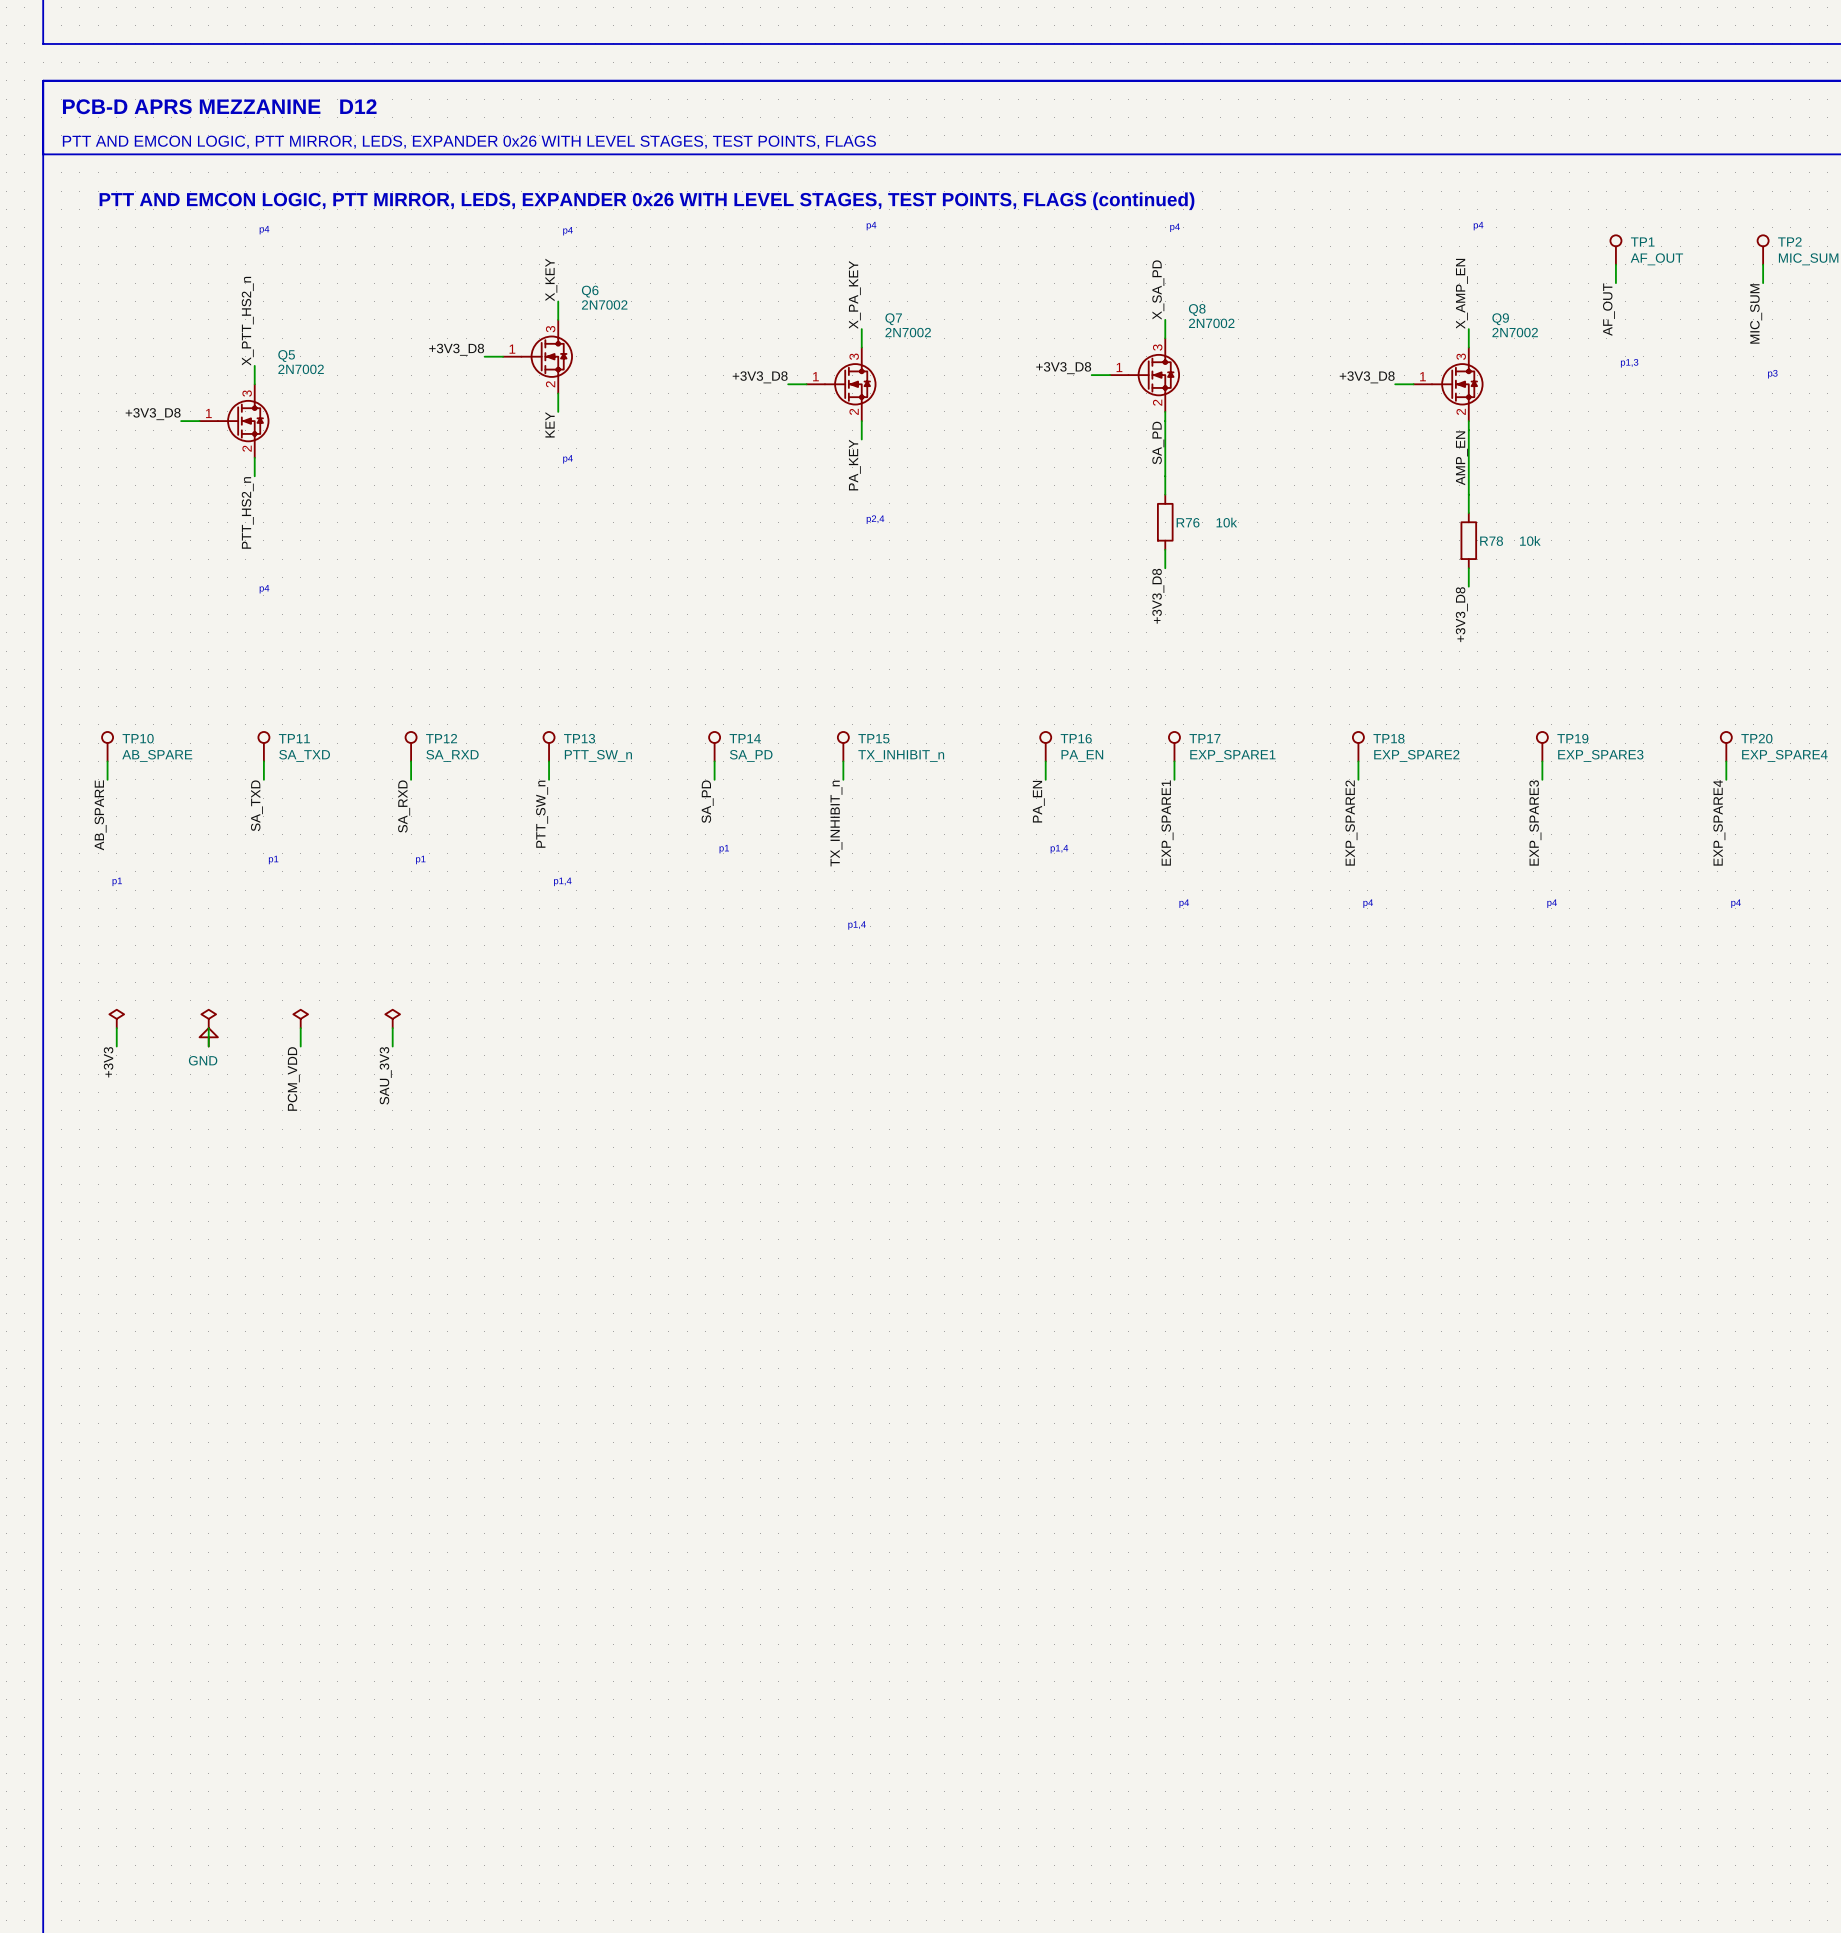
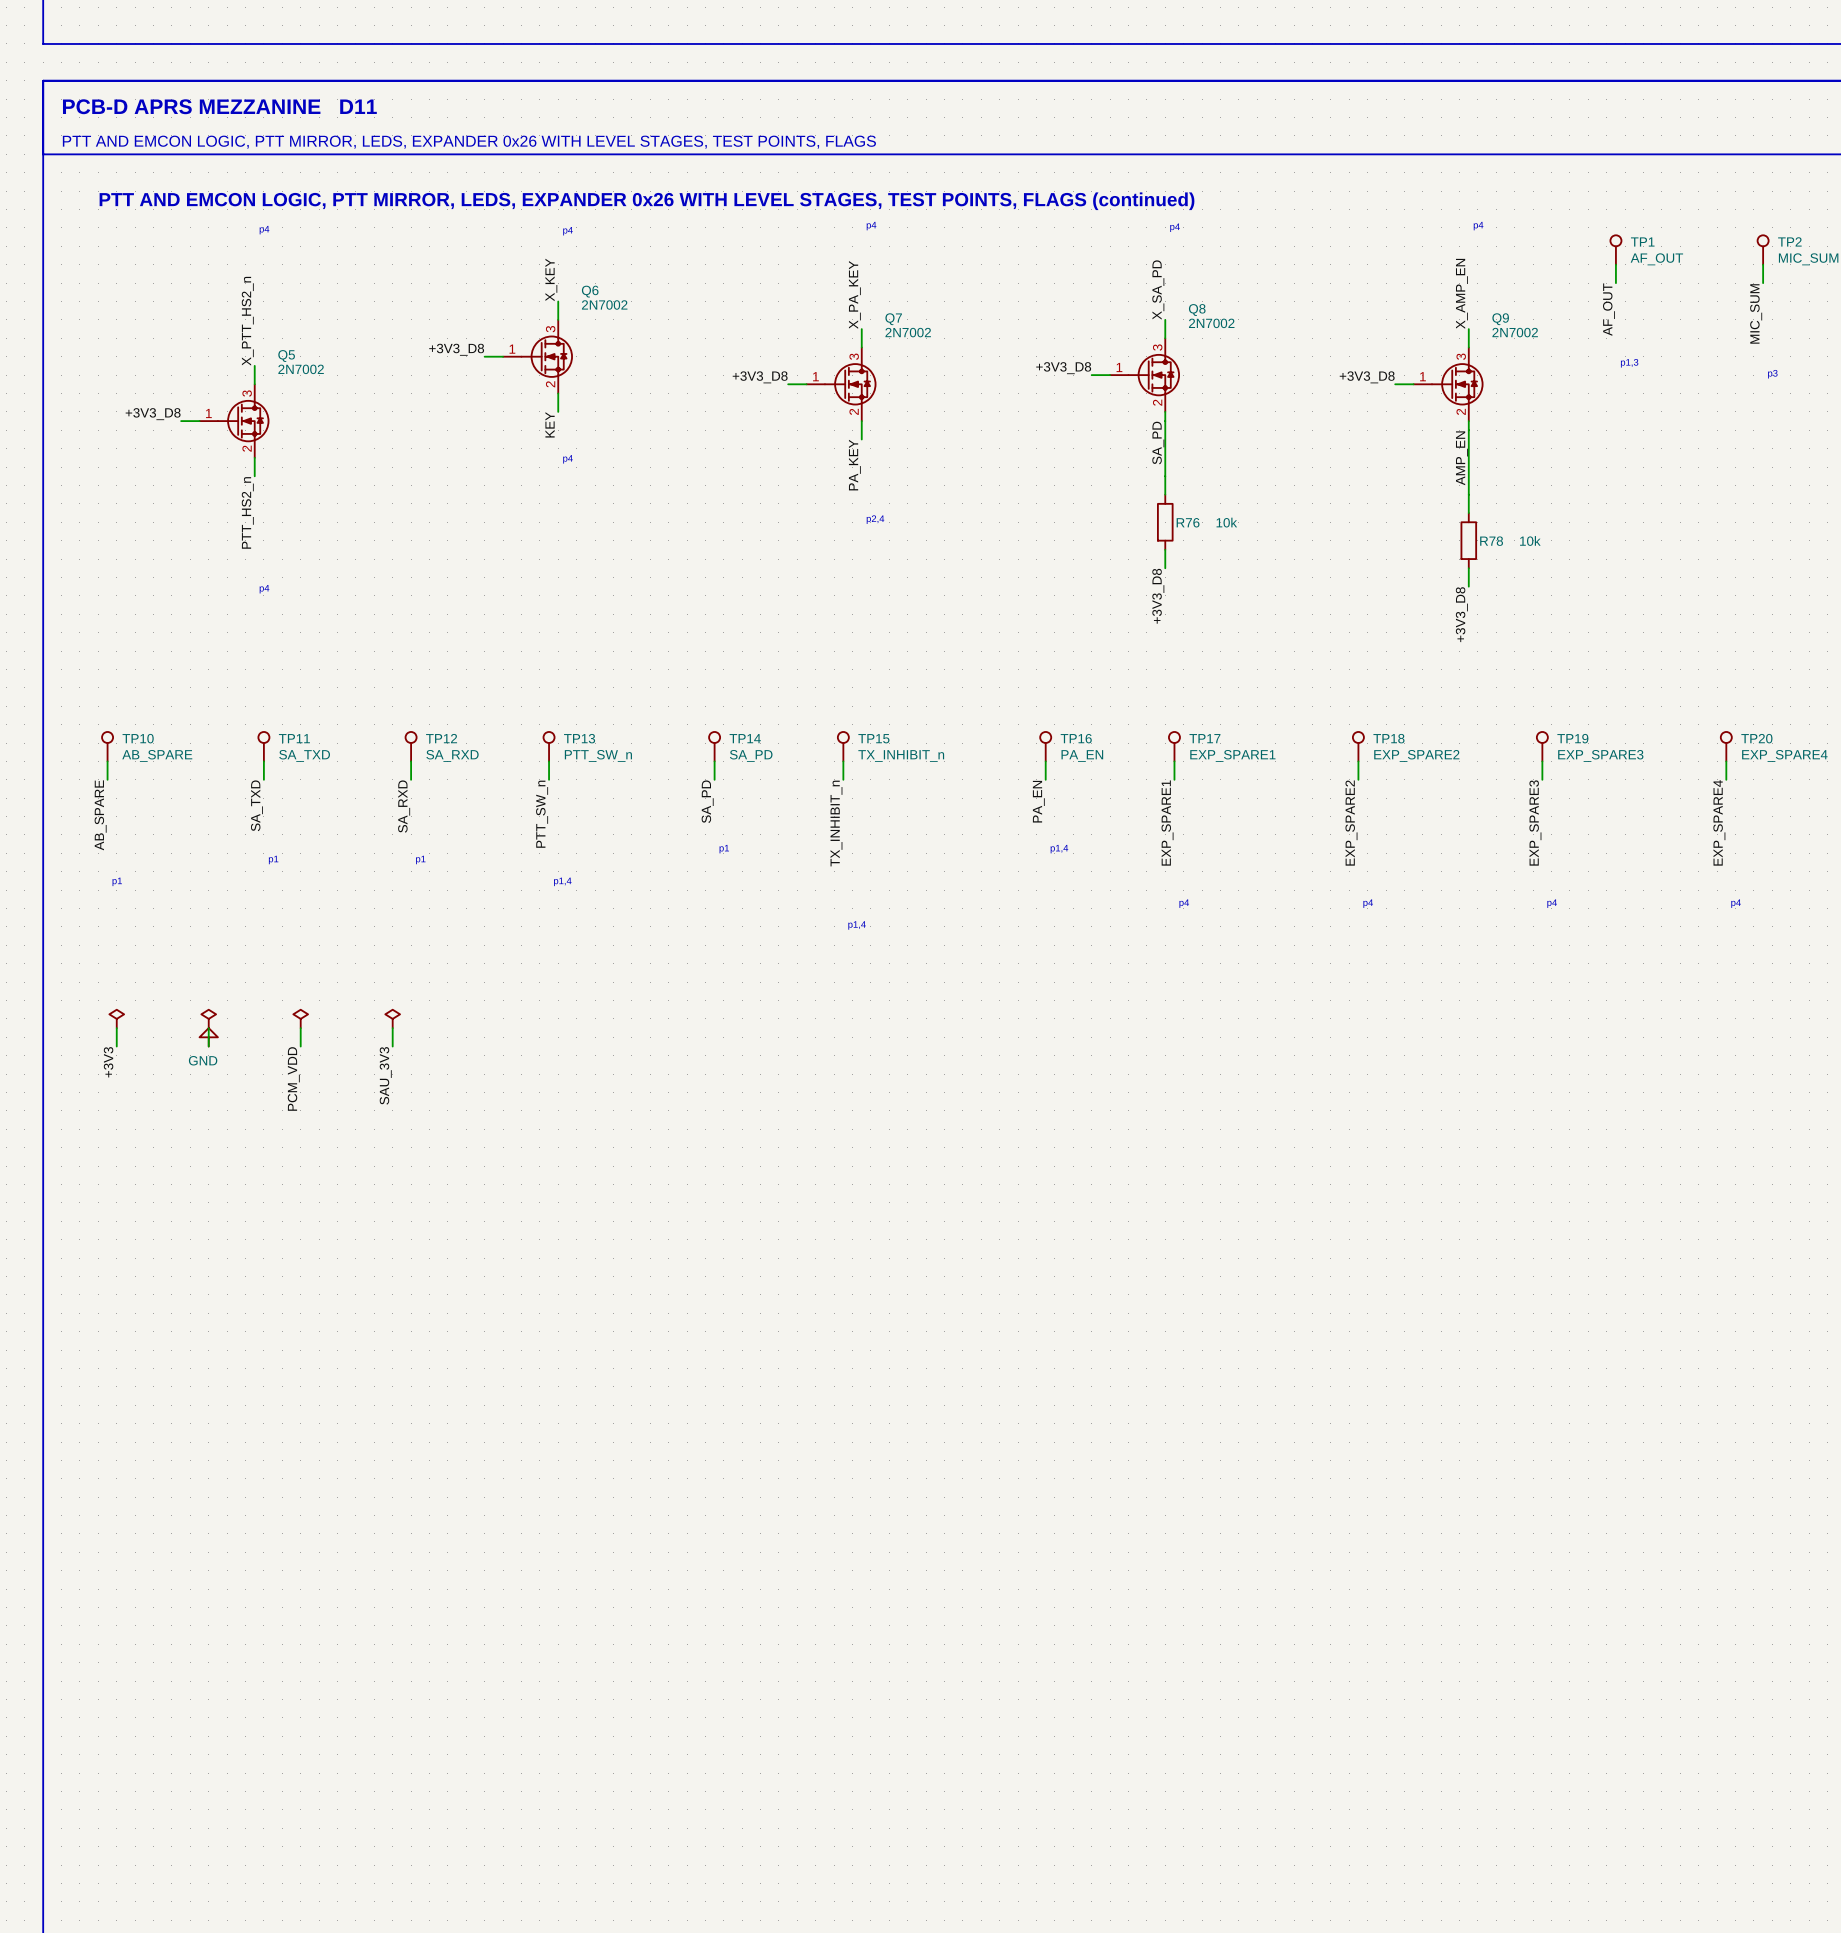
text: PCB-D APRS MEZZANINE D12 (219, 106) -> PCB-D APRS MEZZANINE D11 (219, 106)

